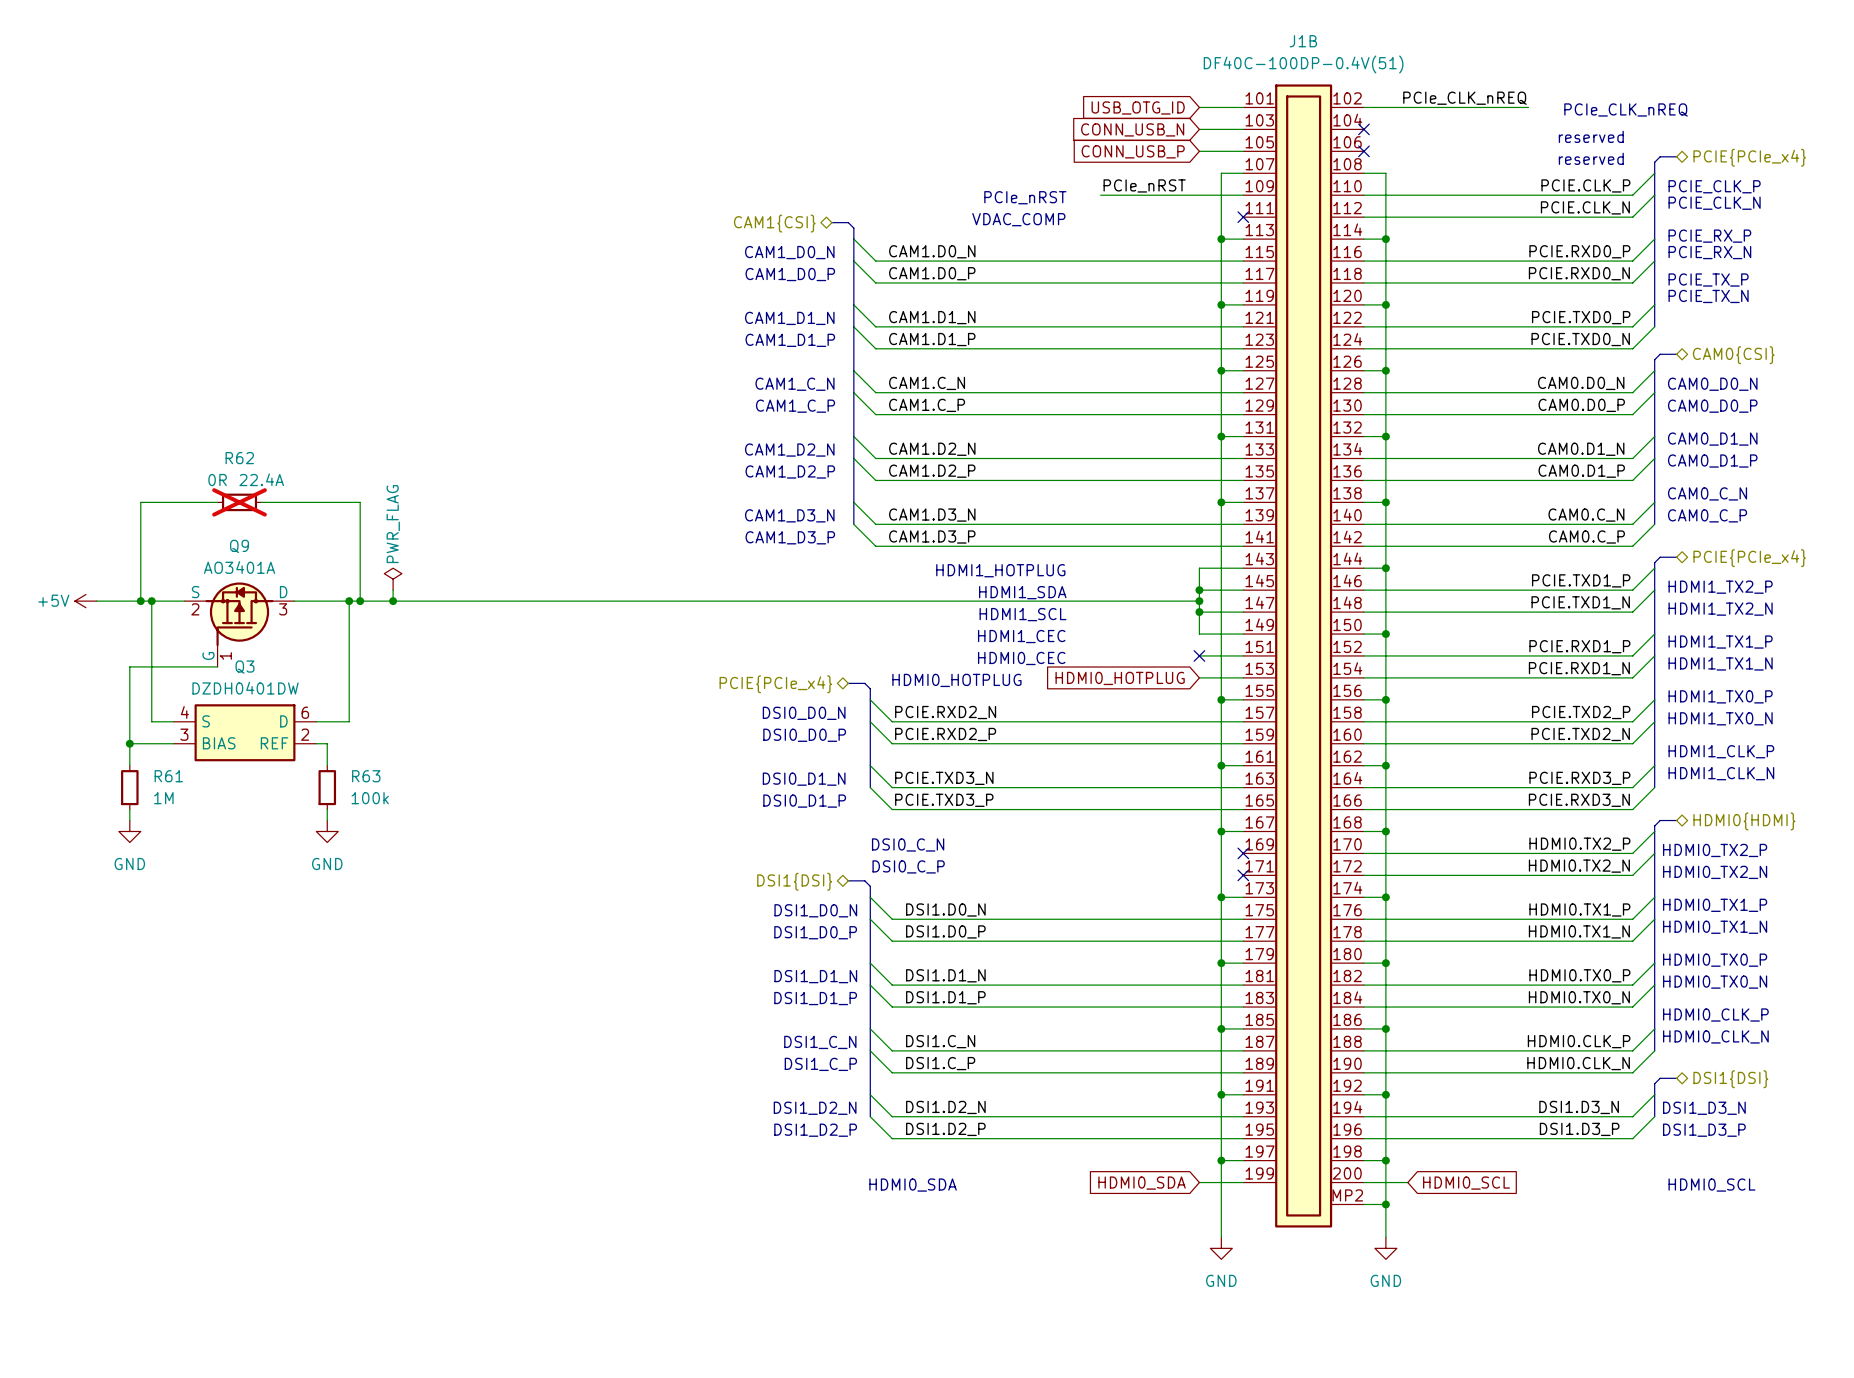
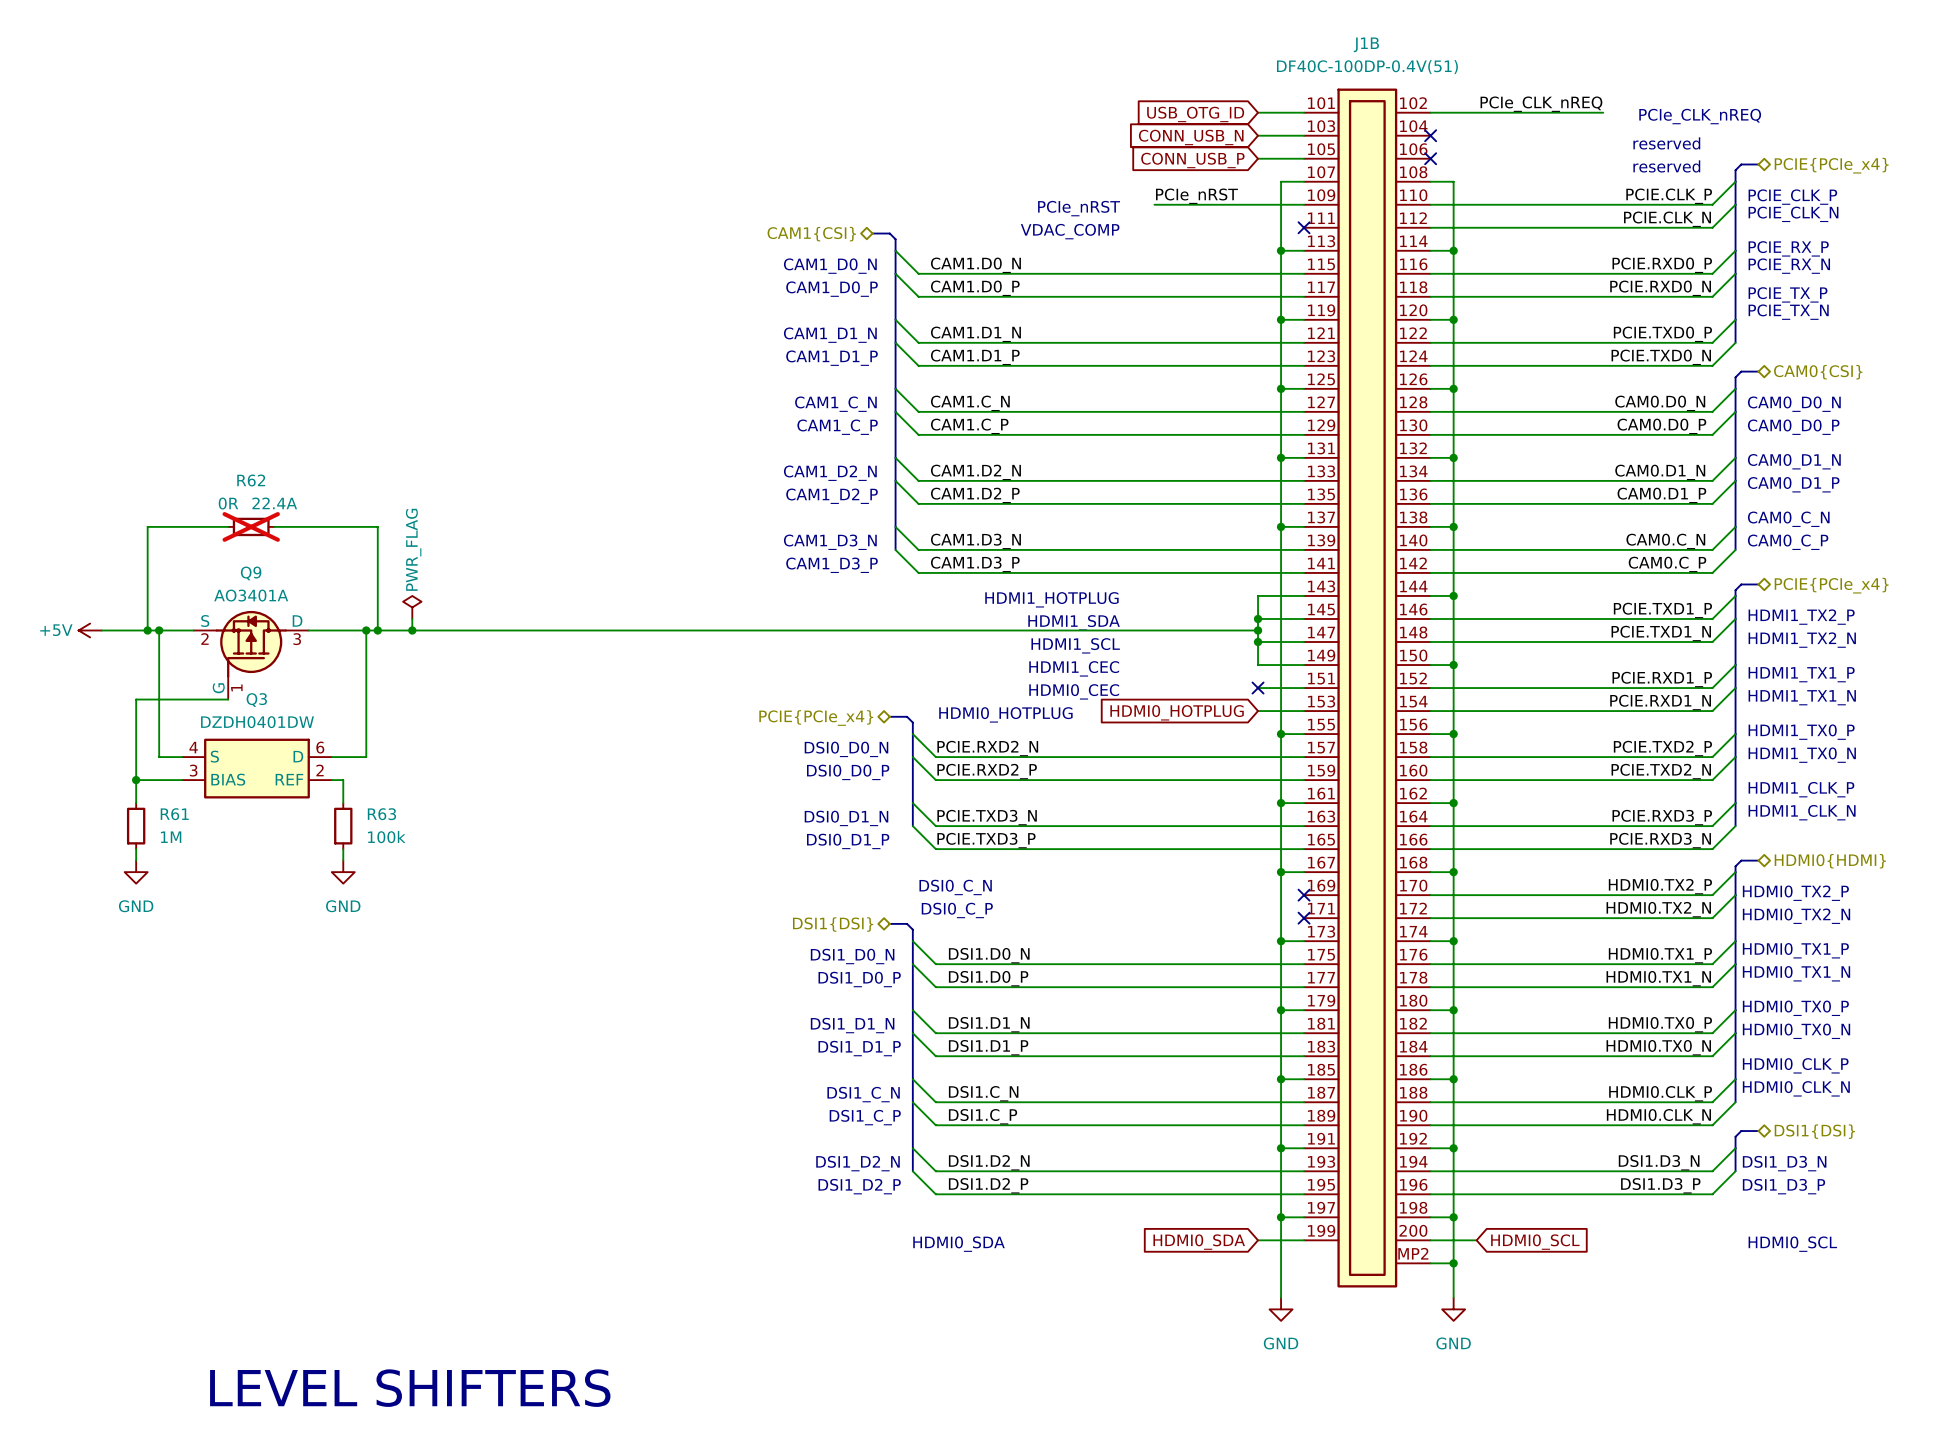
text: none -> LEVEL SHIFTERS (410, 1388)

